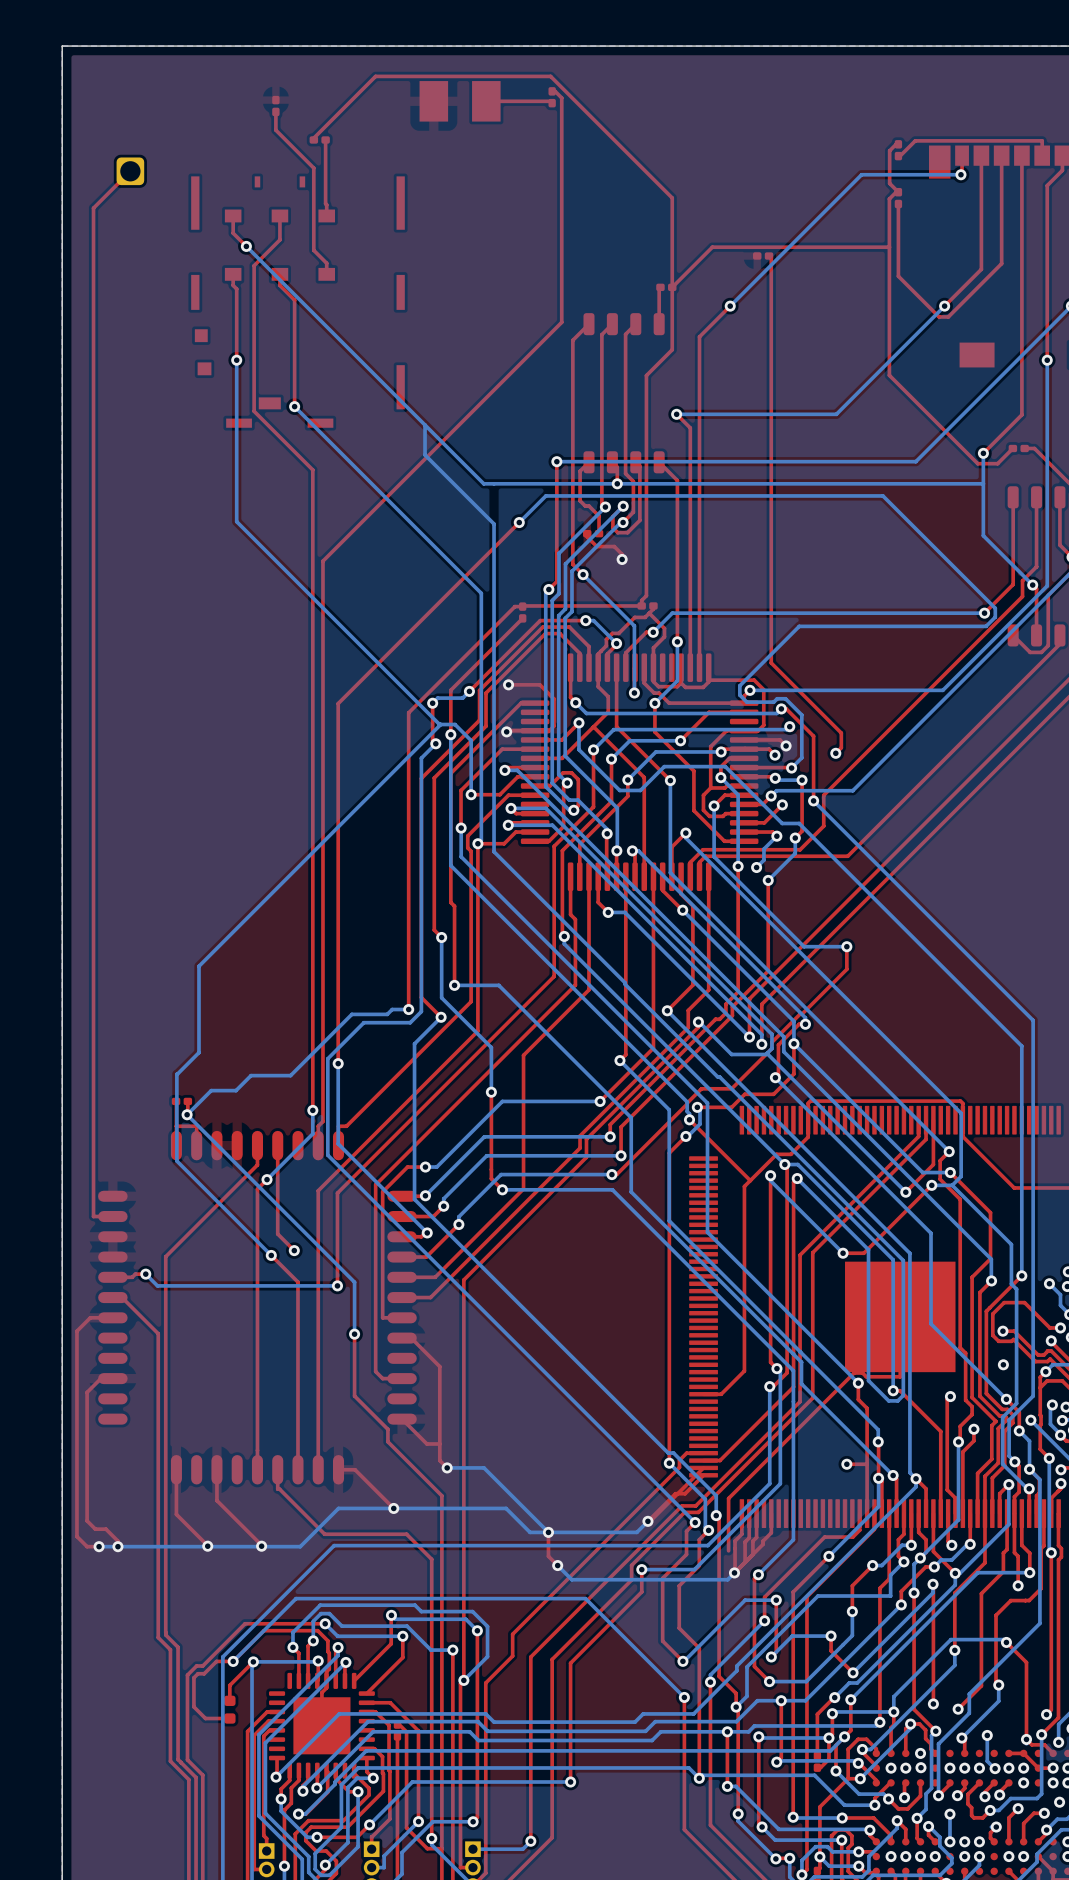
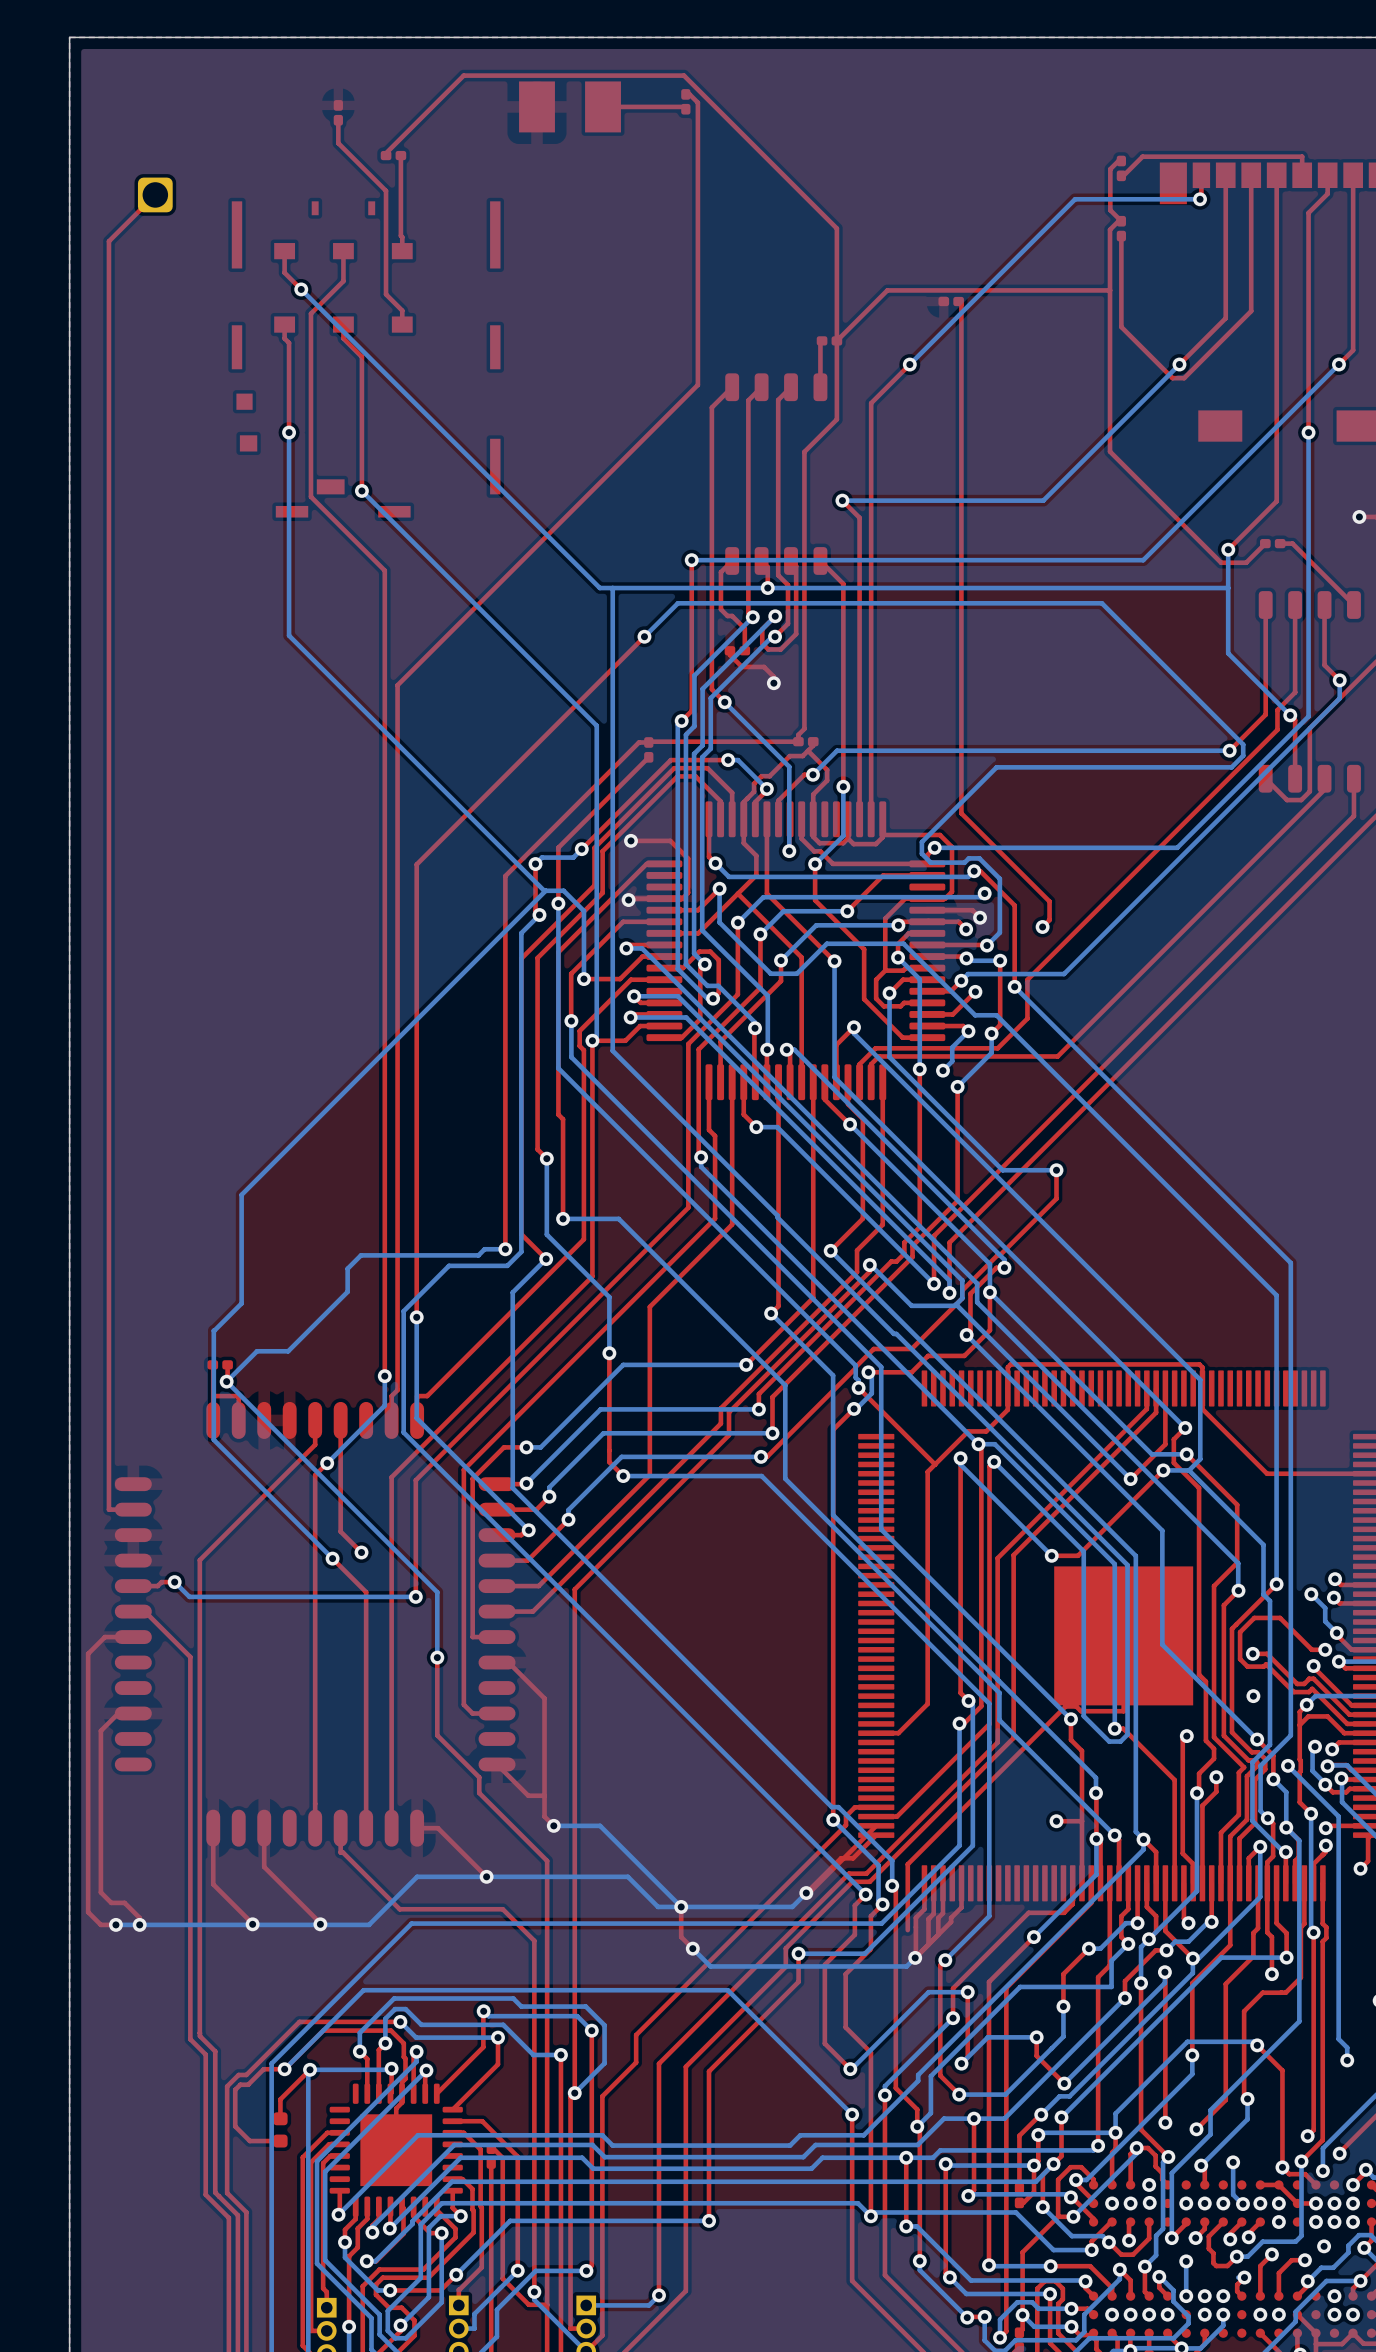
bottom track: (425, 425) (425, 455) (494, 524) -> (612, 588) (612, 638)
bottom track: (351, 1014) (290, 1075) (251, 1075) -> (433, 1255) (360, 1255) (347, 1268) (347, 1291) (307, 1332)

